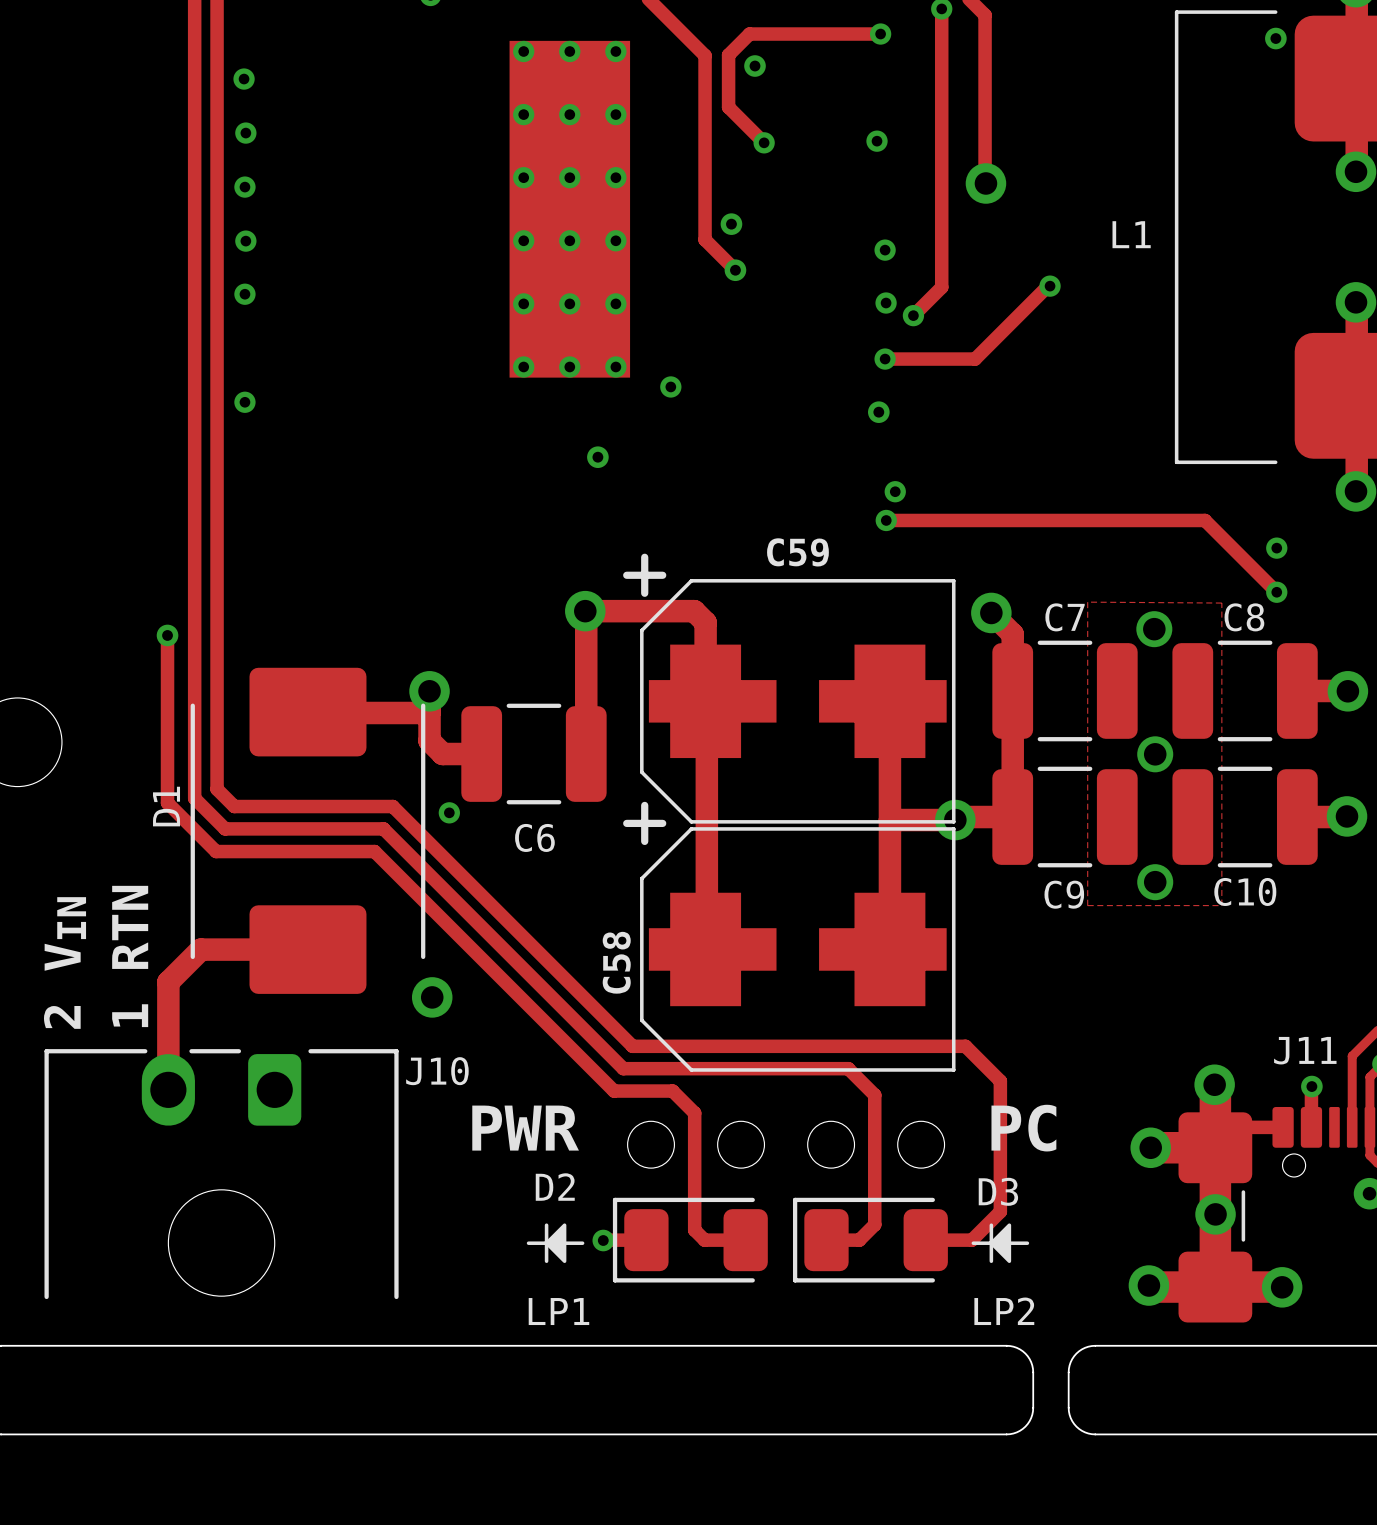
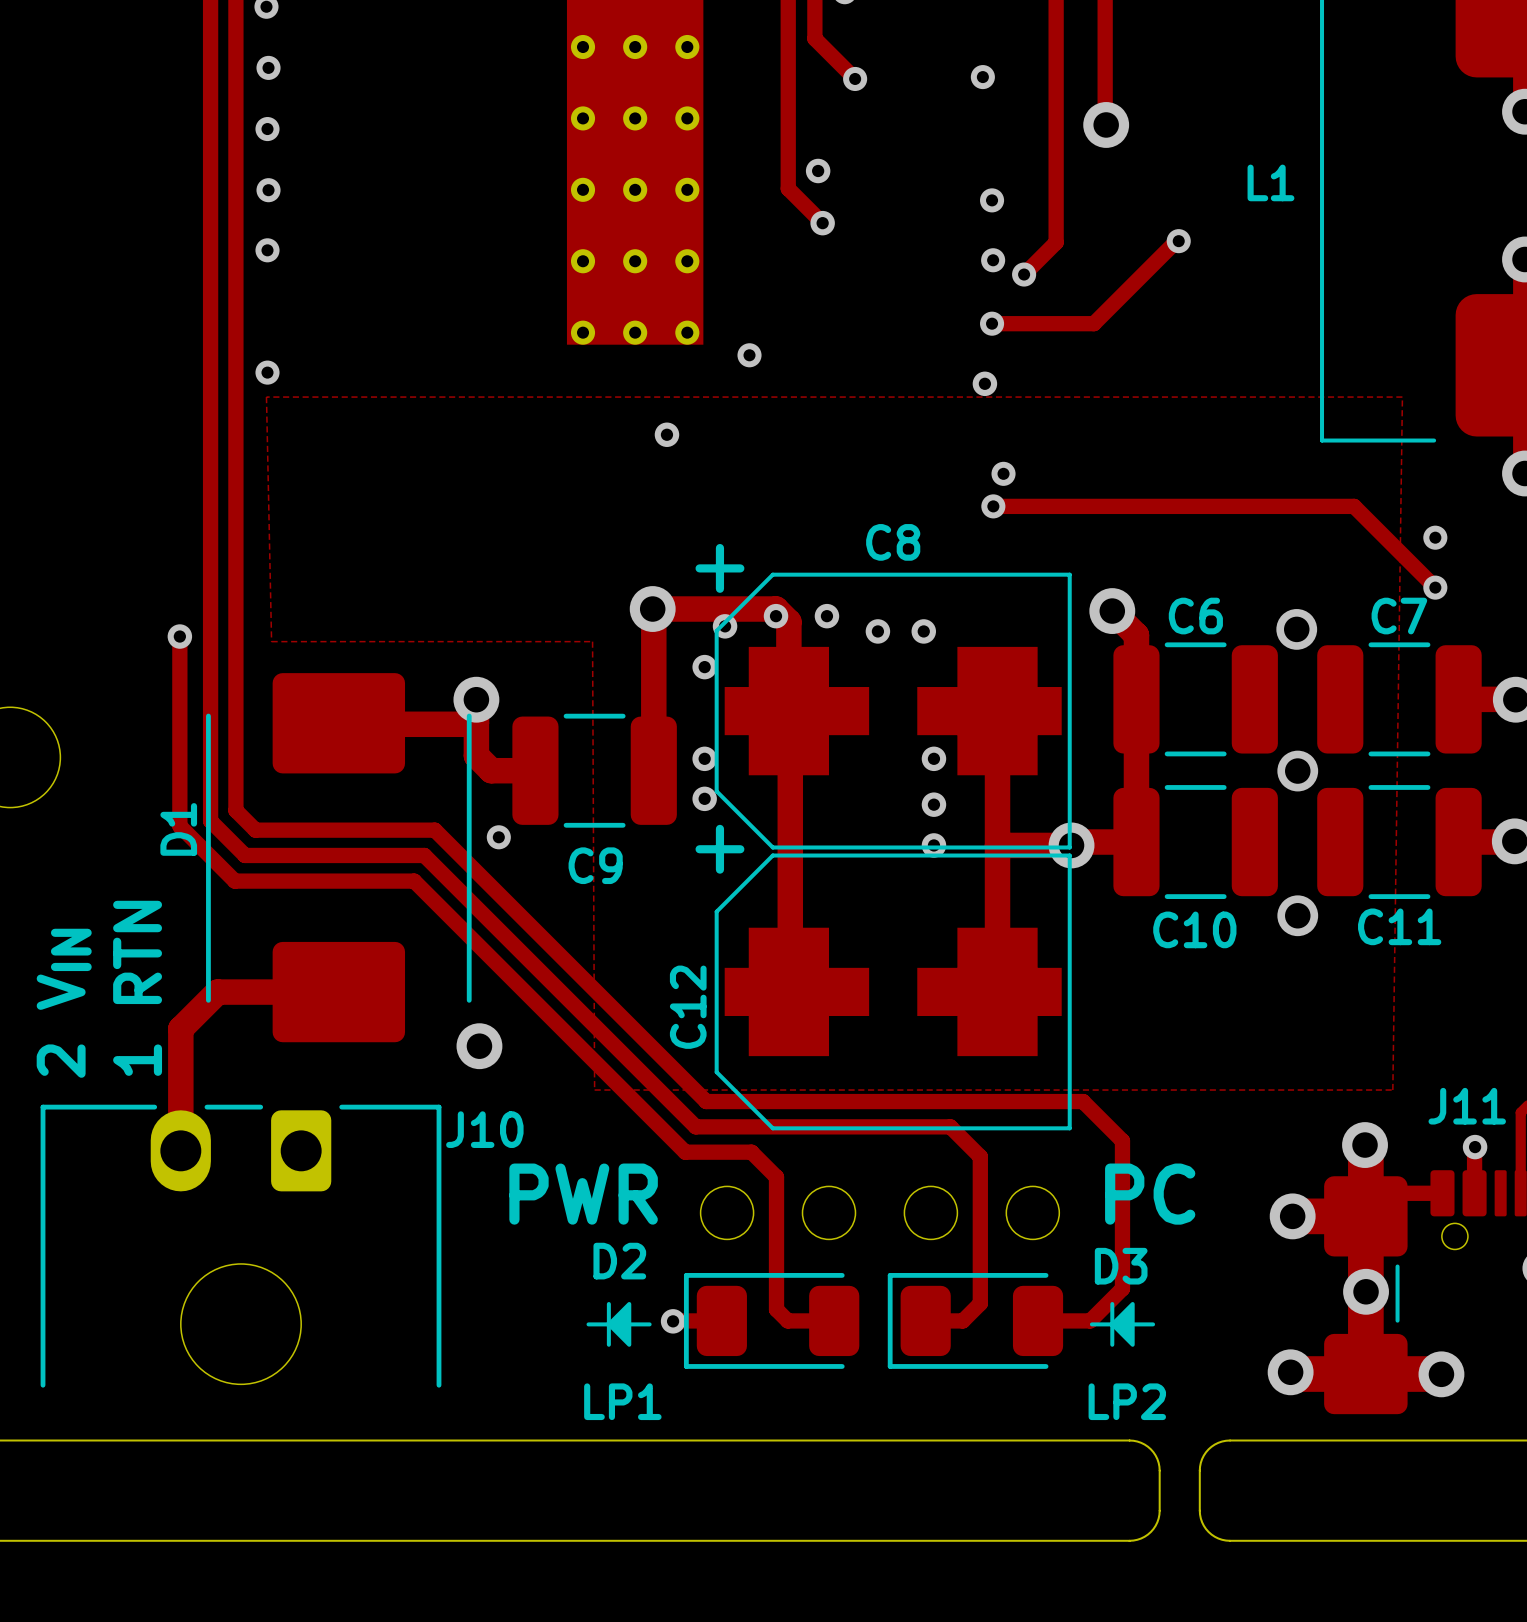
zone outline: none -> (266, 397) (1402, 397) (1392, 1090) (594, 1090) (592, 641) (271, 641) (266, 397)
C59 name: C59 (797, 552) -> C8 (893, 542)
zone outline: (1087, 602) (1087, 905) (1221, 905) (1221, 603) (1087, 602) -> none
via: none -> (776, 616)
via: none -> (826, 616)
C7 name: C7 (1065, 617) -> C6 (1195, 616)
C8 name: C8 (1244, 617) -> C7 (1399, 616)
via: none -> (725, 626)
via: none -> (877, 631)
via: none -> (923, 631)
via: none -> (704, 667)
via: none -> (704, 758)
via: none -> (933, 758)
via: none -> (704, 798)
via: none -> (933, 804)
via: none -> (933, 845)
C6 name: C6 (534, 837) -> C9 (595, 865)
C10 name: C10 (1245, 891) -> C11 (1399, 926)
C9 name: C9 (1064, 894) -> C10 (1194, 929)
C58 name: C58 (616, 962) -> C12 (688, 1007)

